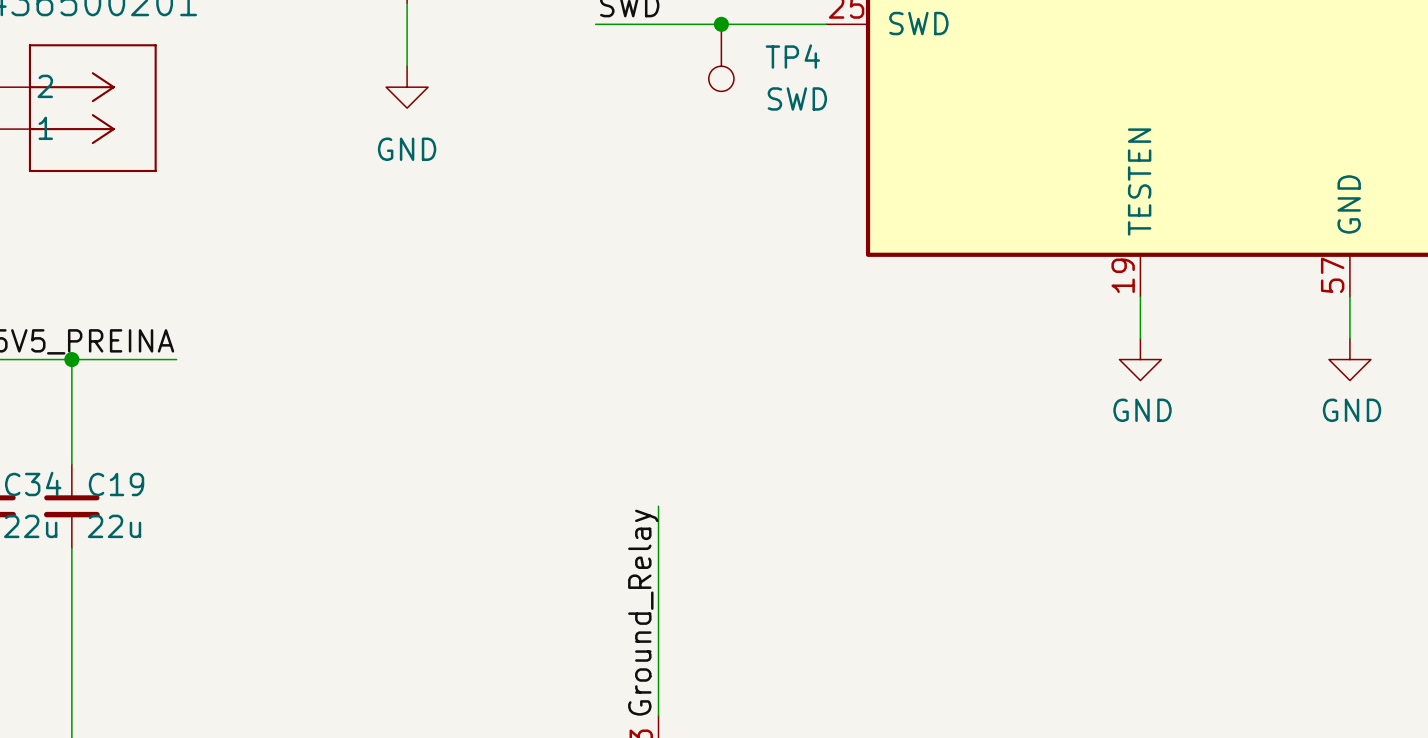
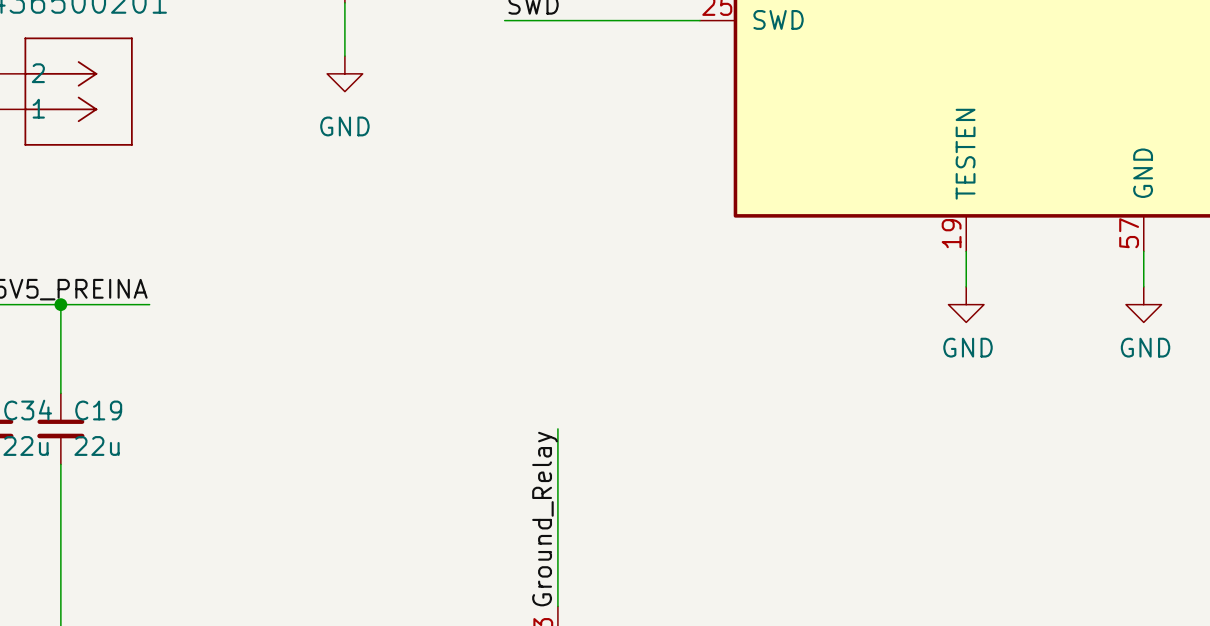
junction: (721, 24) -> none
TP4: SWD (721, 57) -> none

